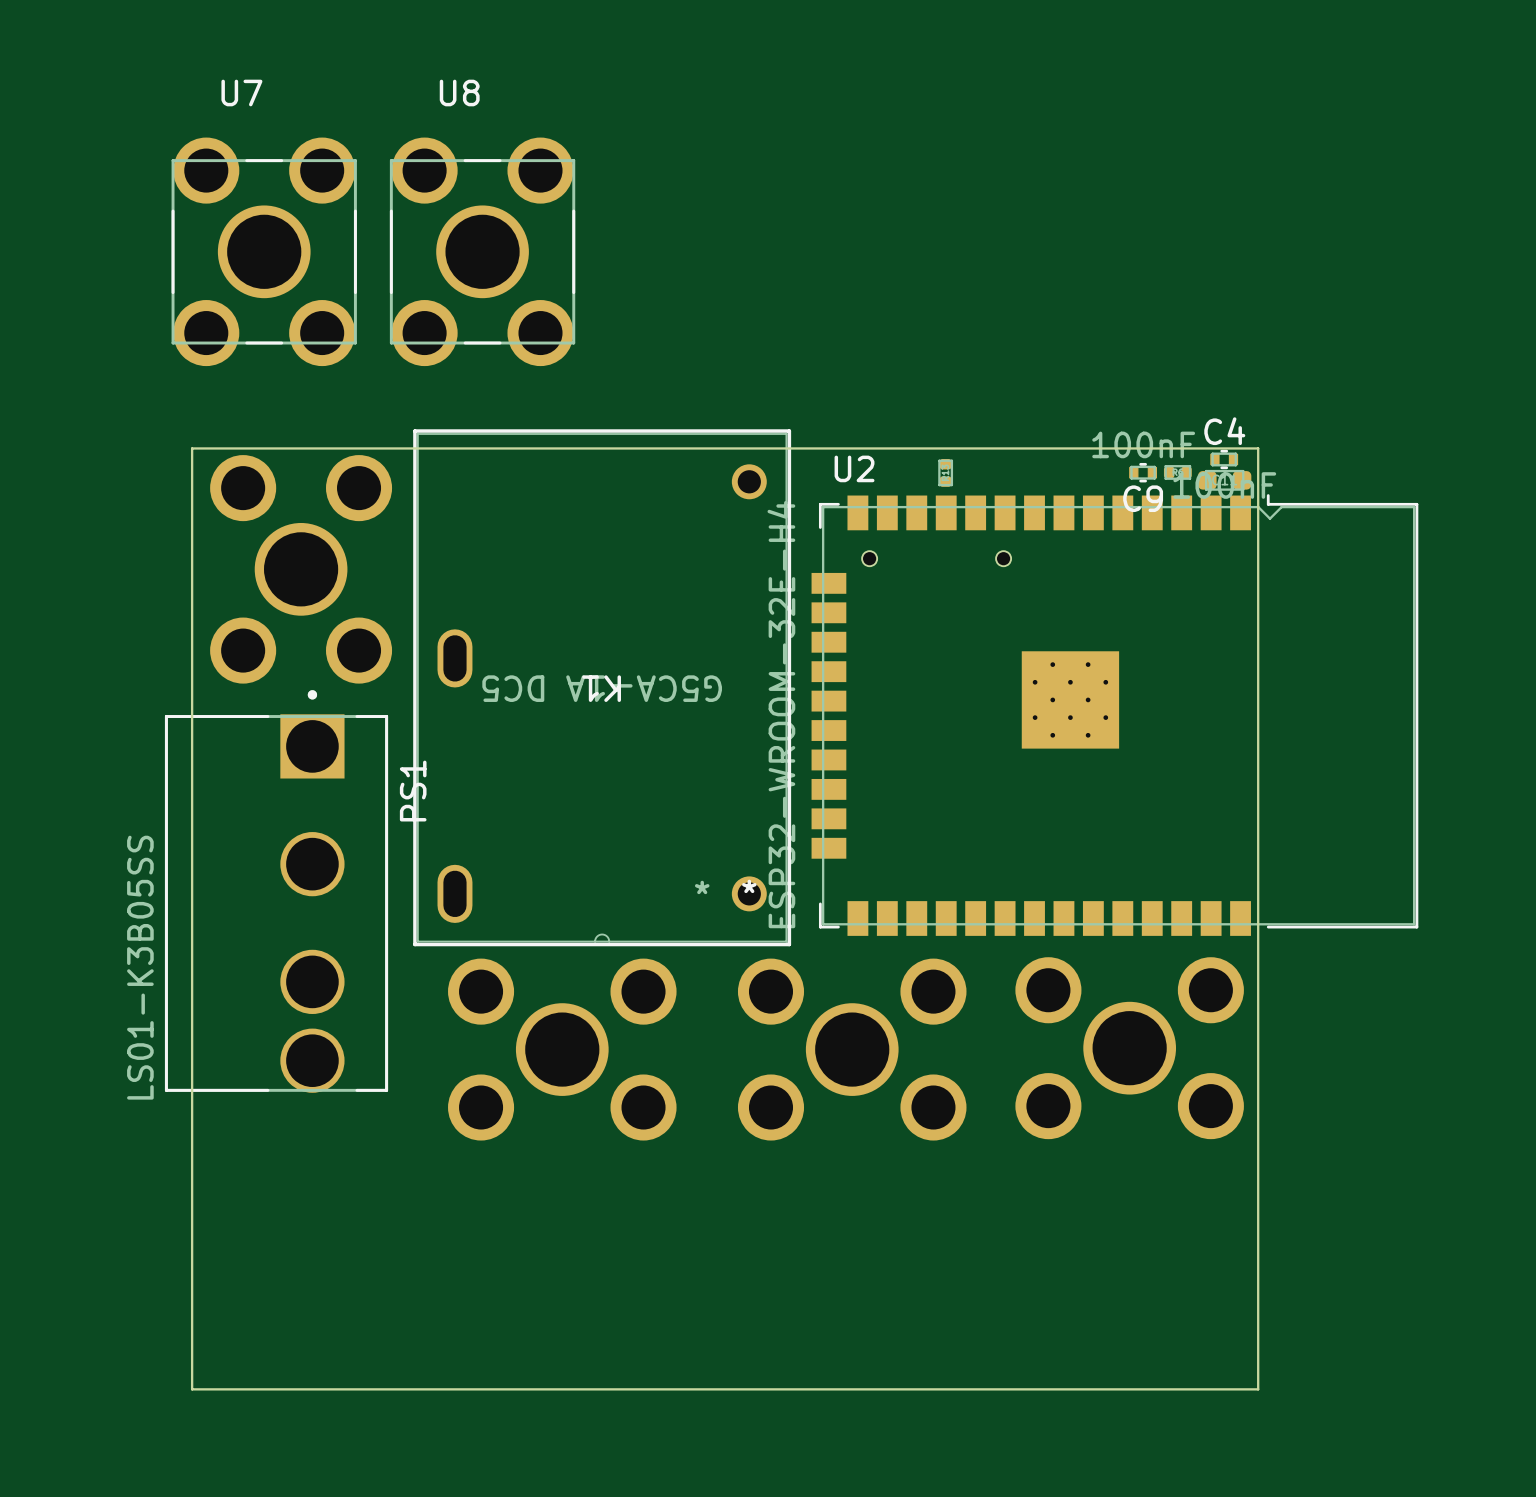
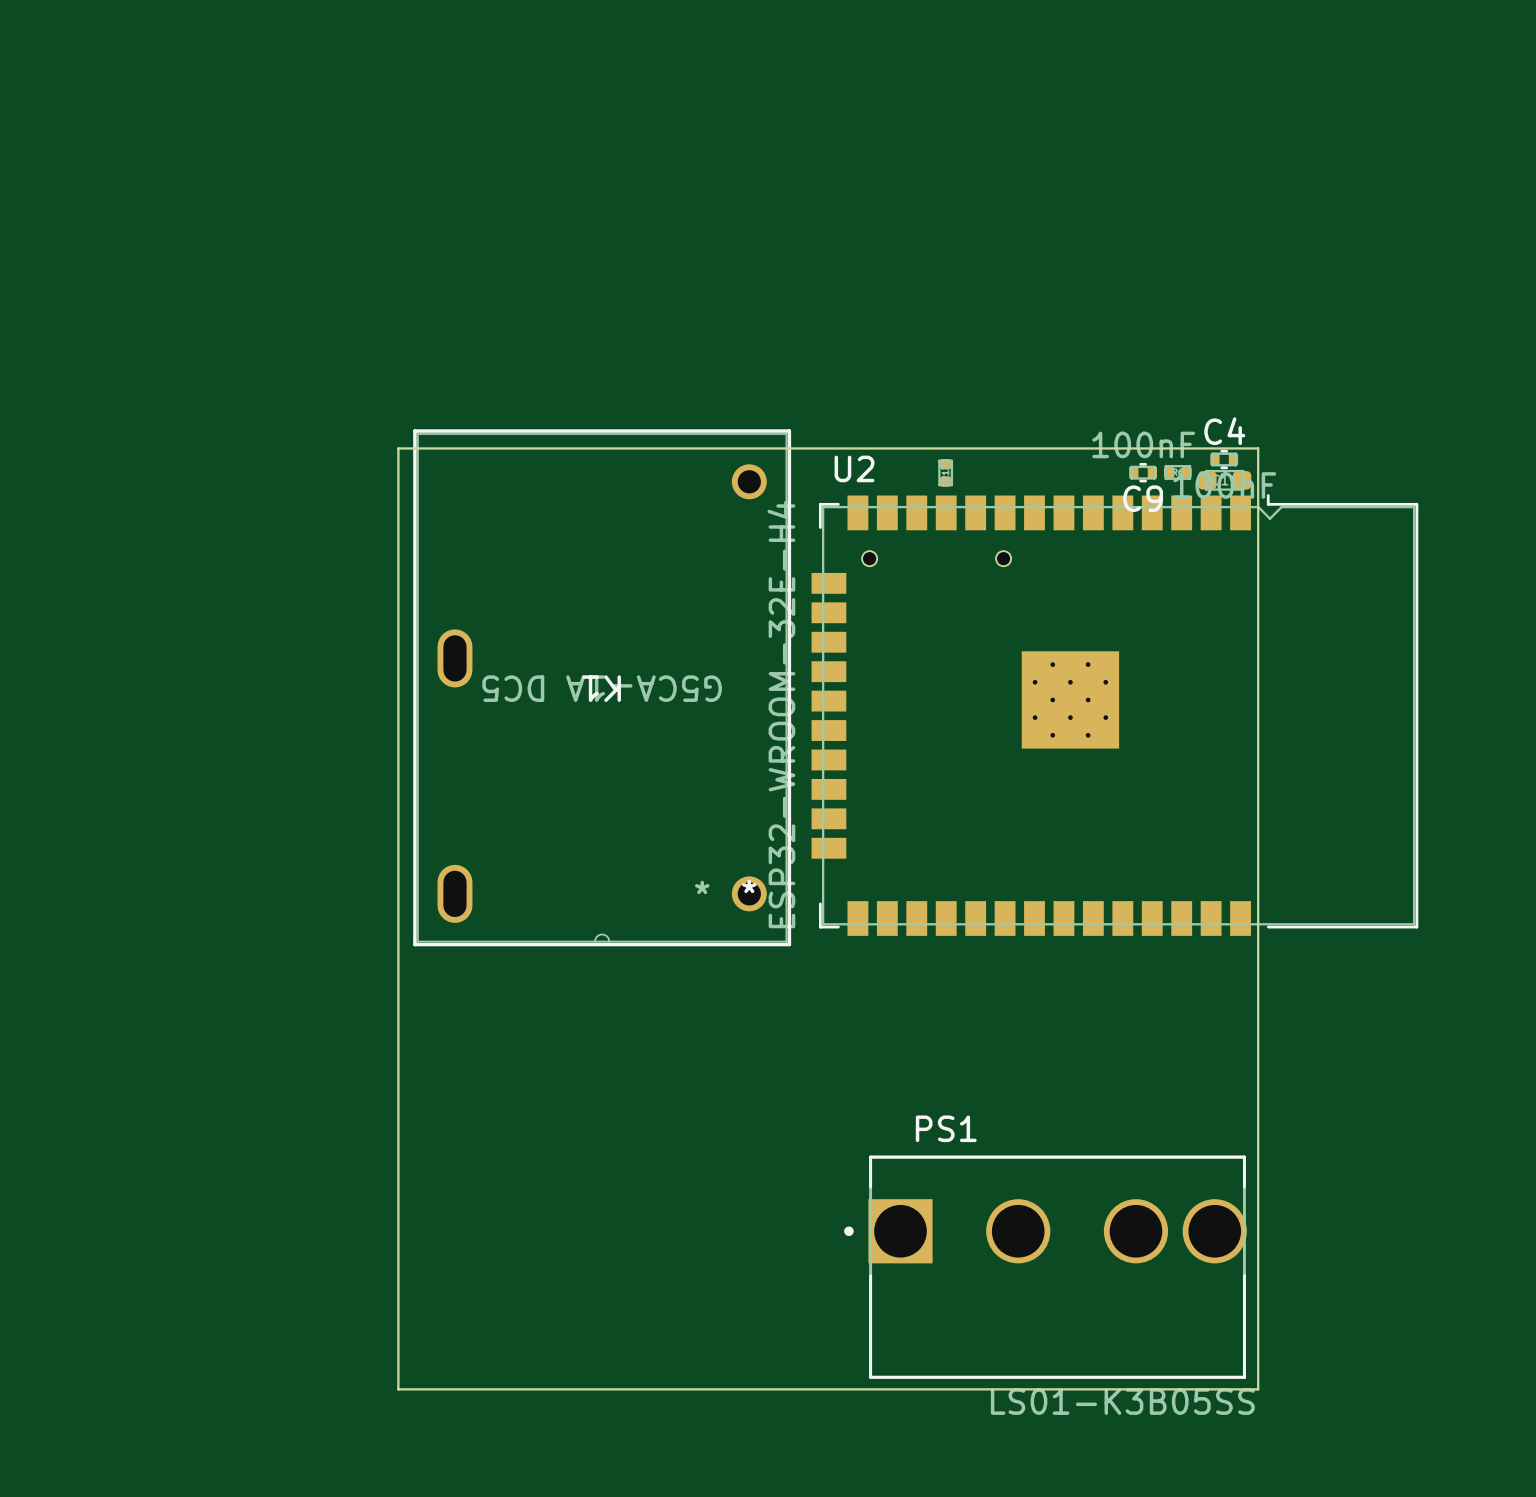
U7: (264, 251) -> none
U8: (482, 251) -> none
board edge: (398, 448) (192, 448) (192, 1389) (398, 1389) -> (398, 448) (398, 1389)
part: (301, 569) -> none
PS1 rotation: 0° (276, 891) -> 90° counterclockwise (1045, 1267)
PS1 position: (276, 891) -> (1045, 1267)
part: (1129, 1048) -> none
part: (562, 1049) -> none
part: (852, 1049) -> none

